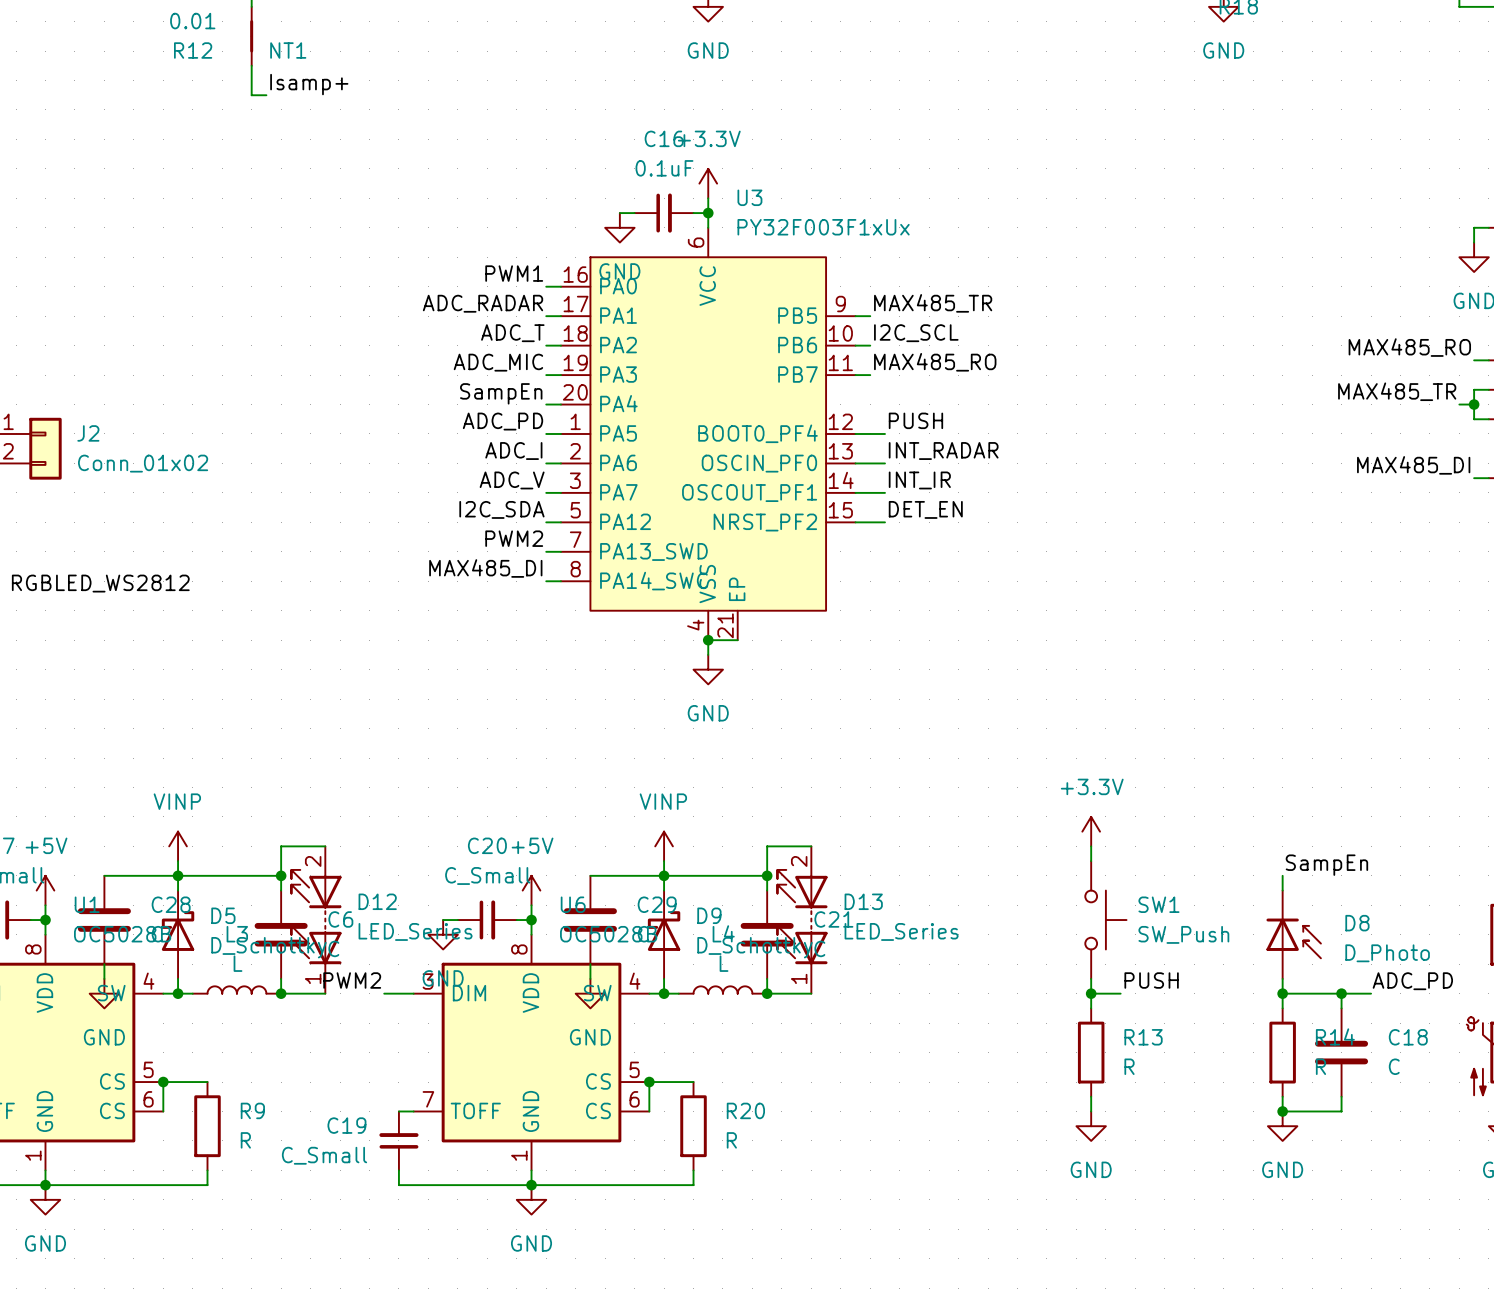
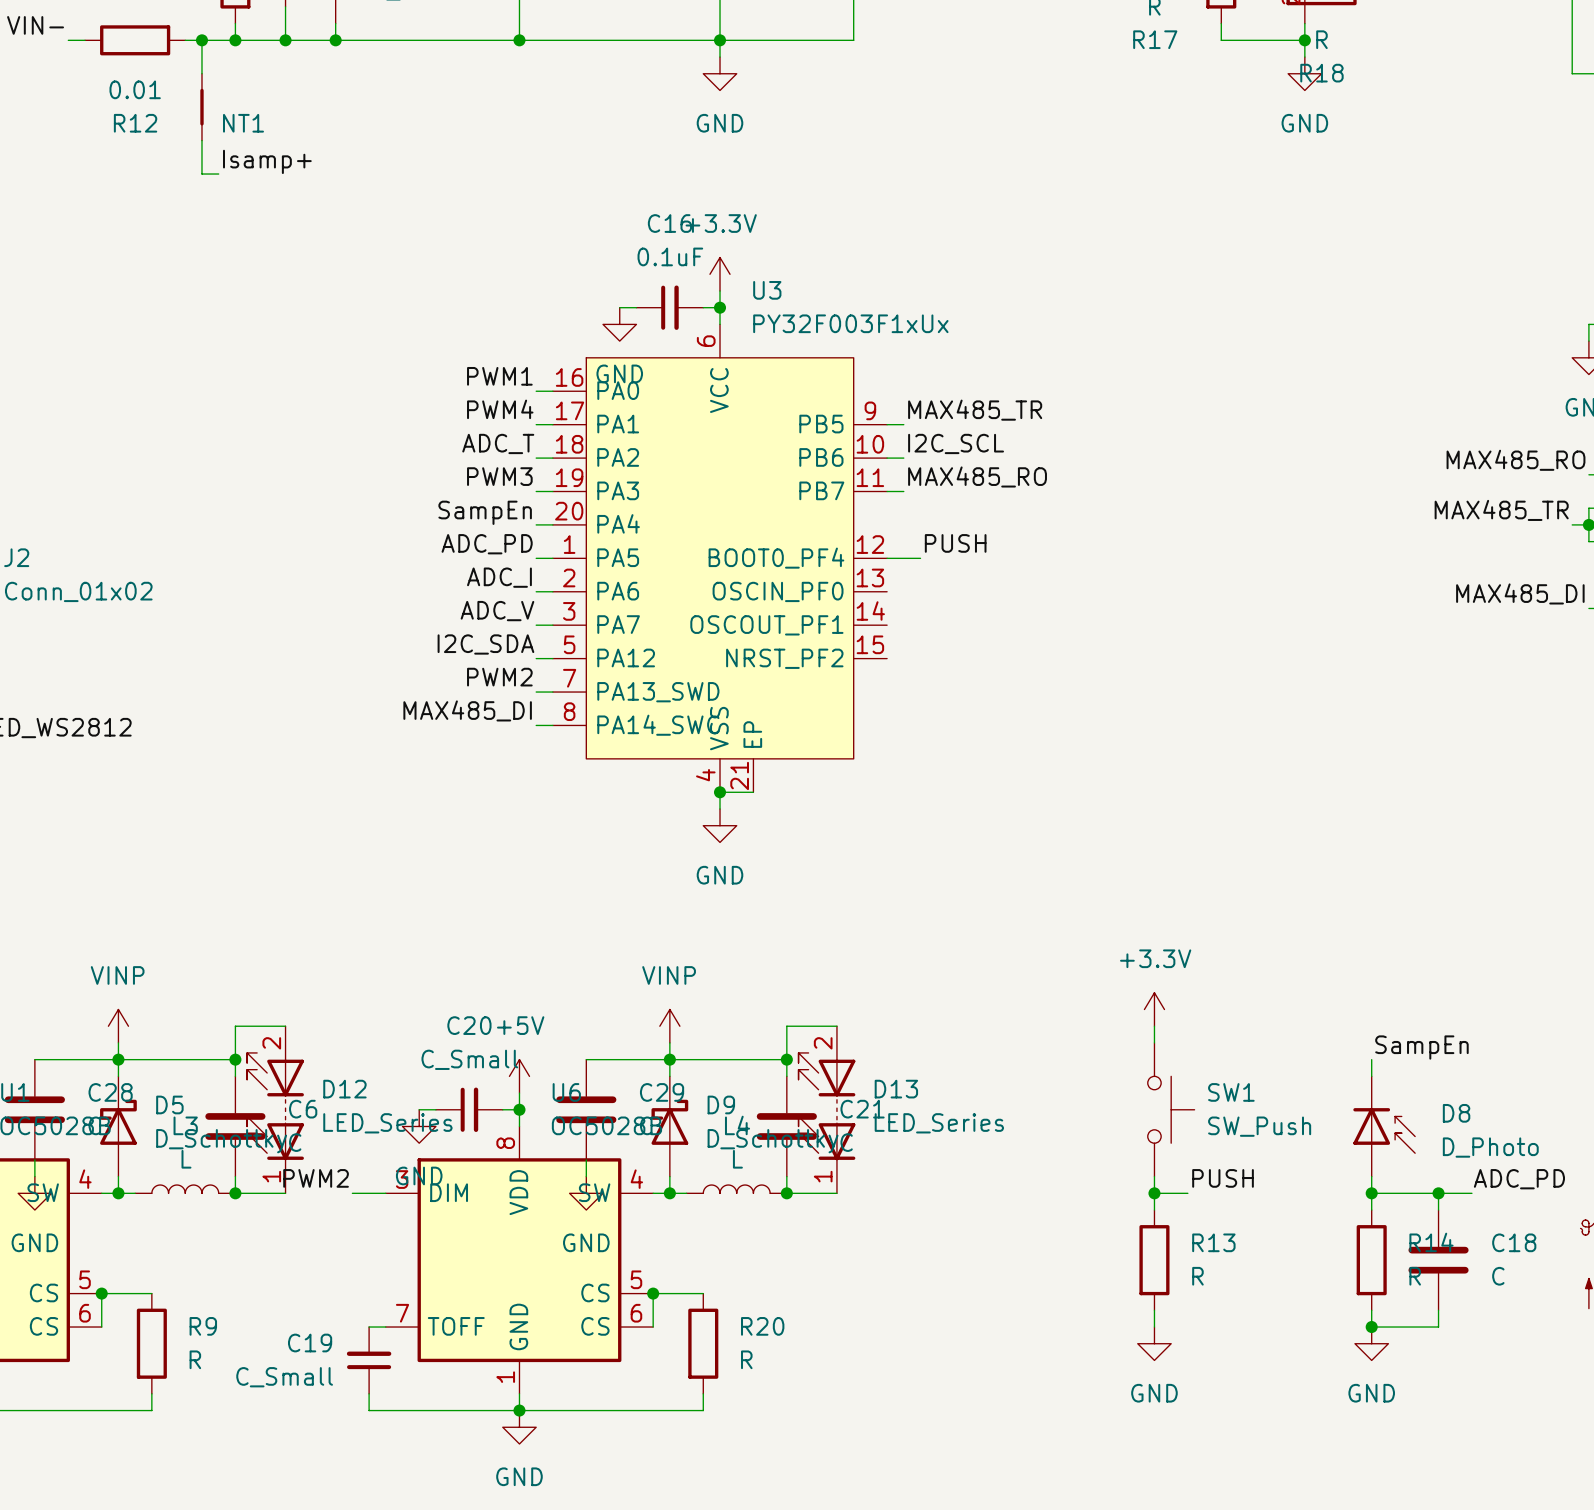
label: ADC_RADAR (483, 303) -> PWM4 (500, 409)
label: ADC_MIC (498, 362) -> PWM3 (499, 476)
label: INT_RADAR (943, 451) -> none
wire: (855, 463) (884, 463) -> none
label: INT_IR (919, 480) -> none
wire: (855, 492) (884, 492) -> none
label: DET_EN (925, 509) -> none
wire: (855, 522) (884, 522) -> none

